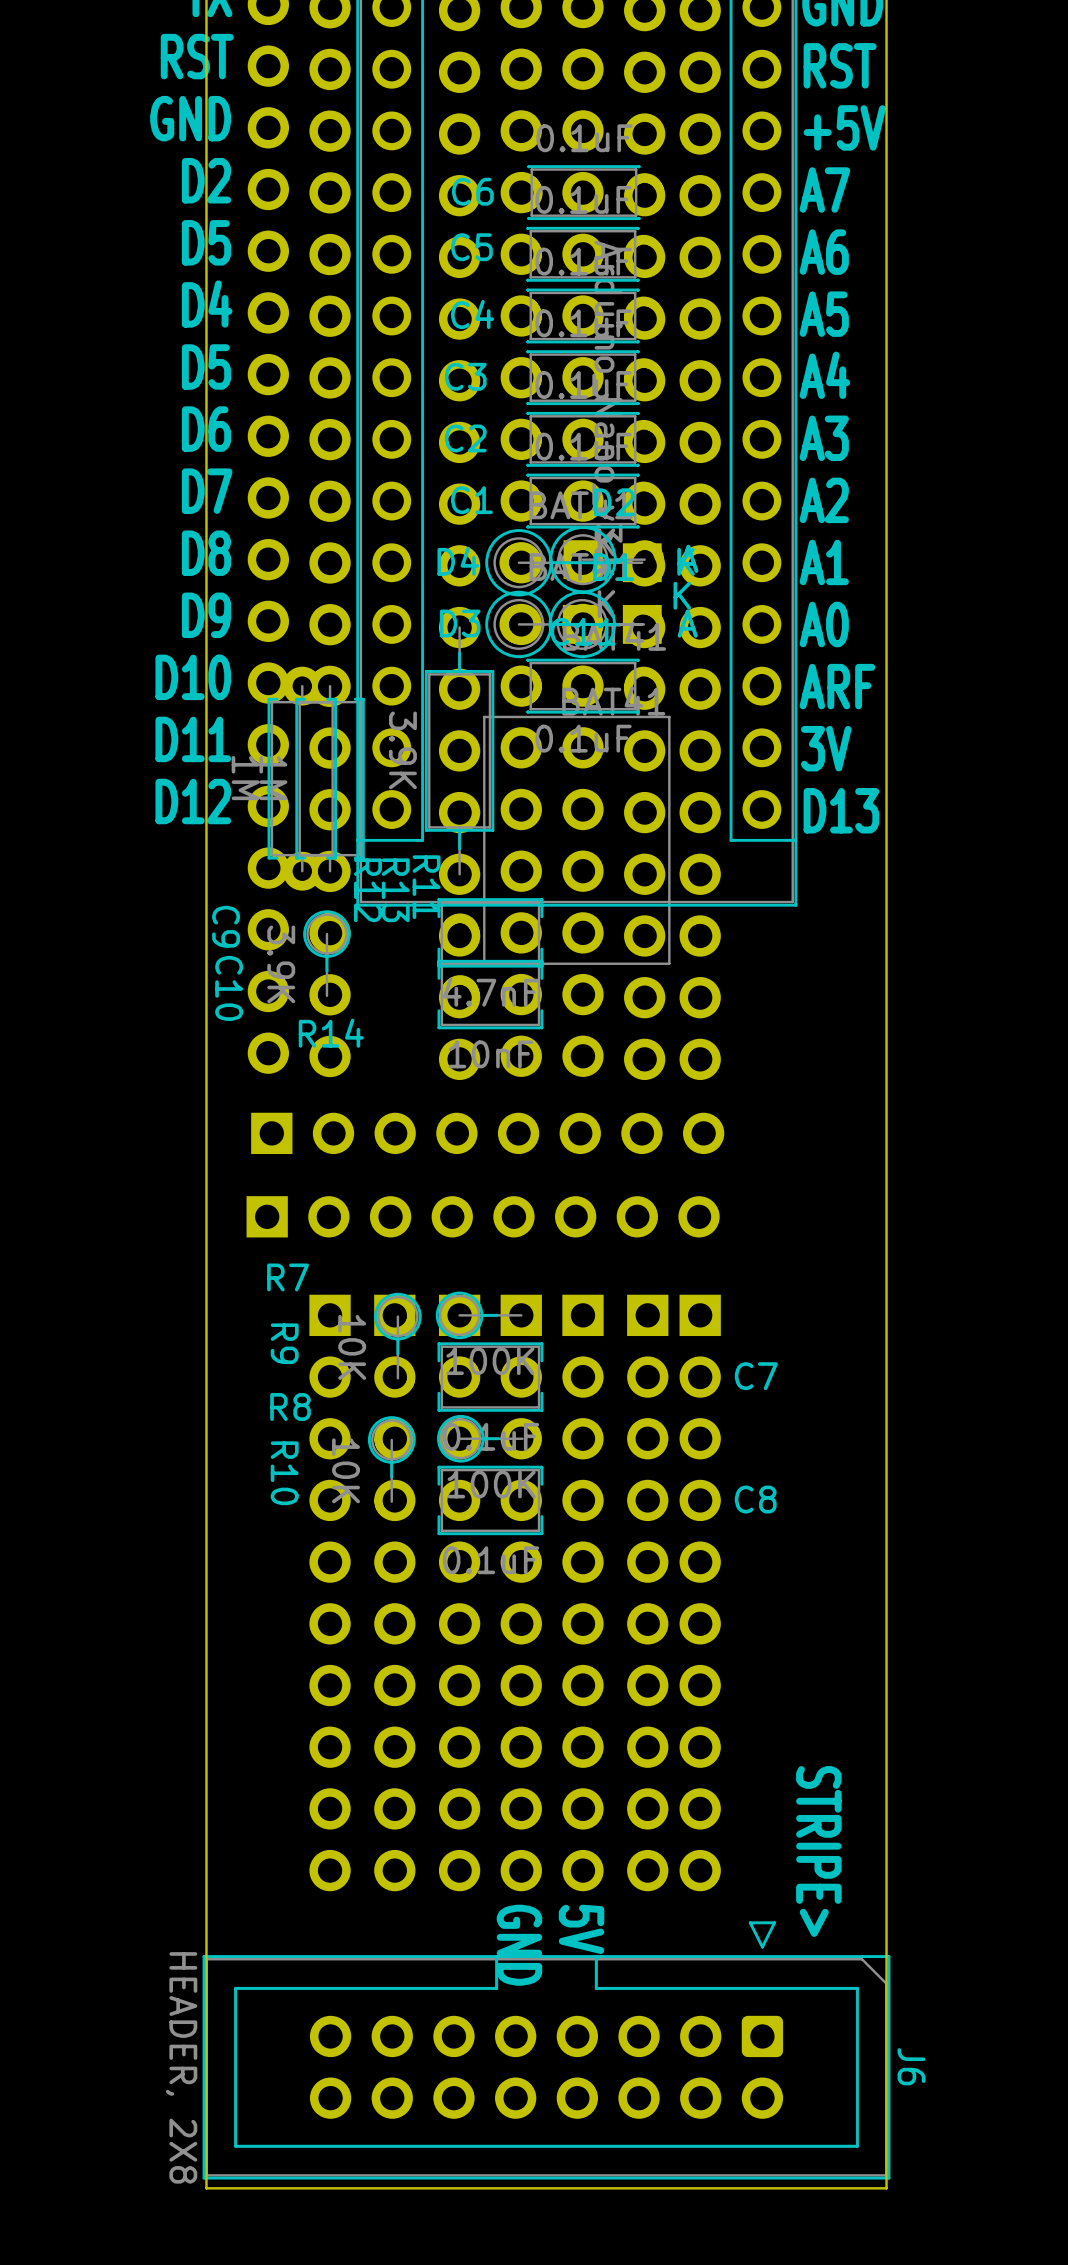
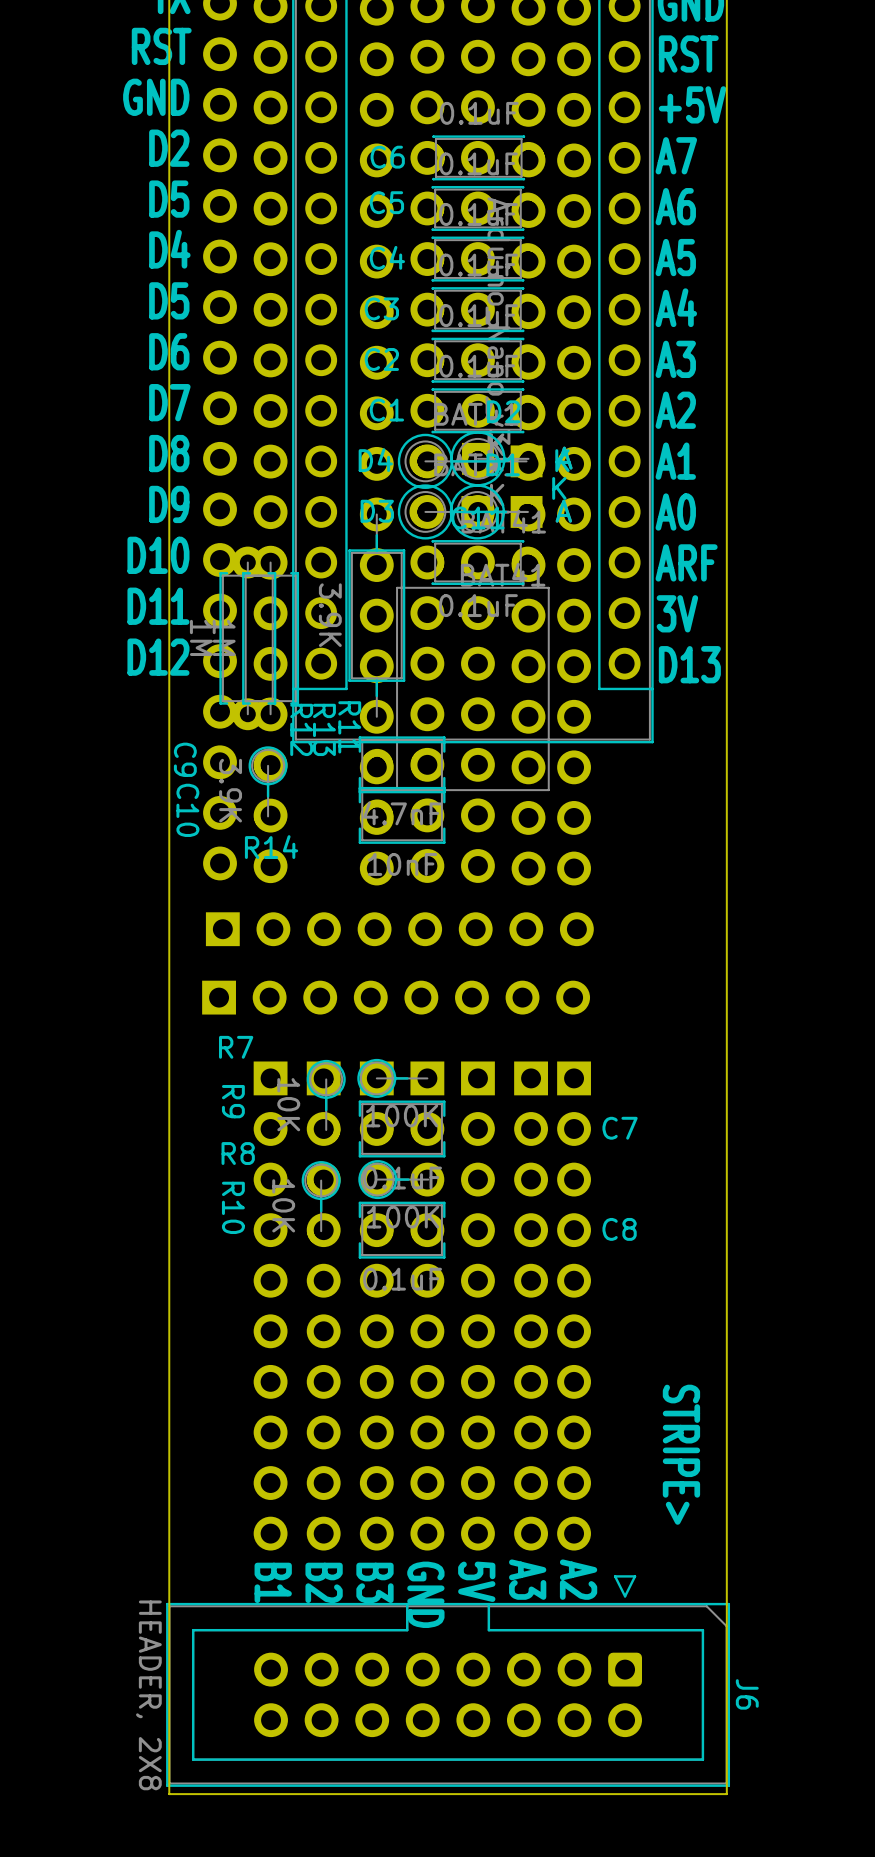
text position: STRIPE> (818, 1851) -> STRIPE> (681, 1454)
text: none -> A3 (527, 1579)
text: none -> A2 (578, 1579)
text: none -> B1 (273, 1582)
text: none -> B2 (324, 1582)
text: none -> B3 (374, 1582)

